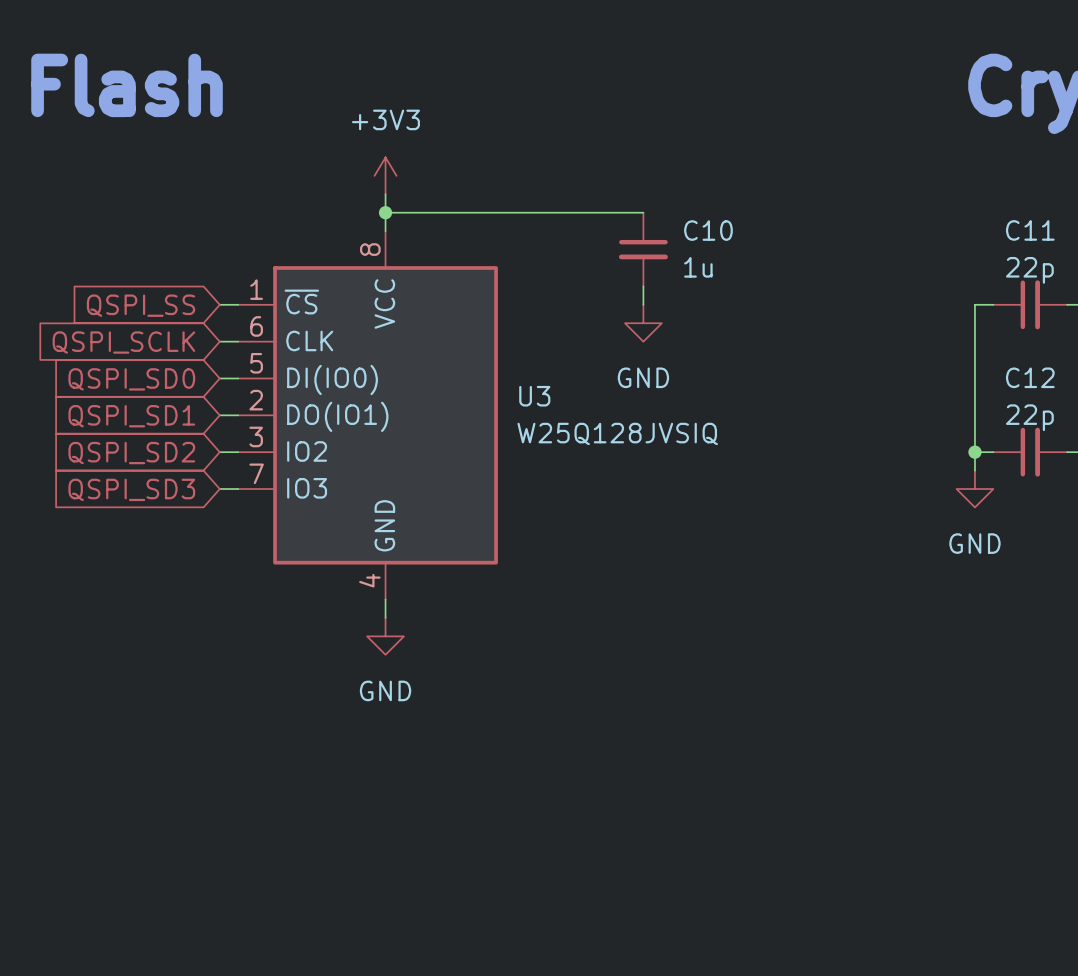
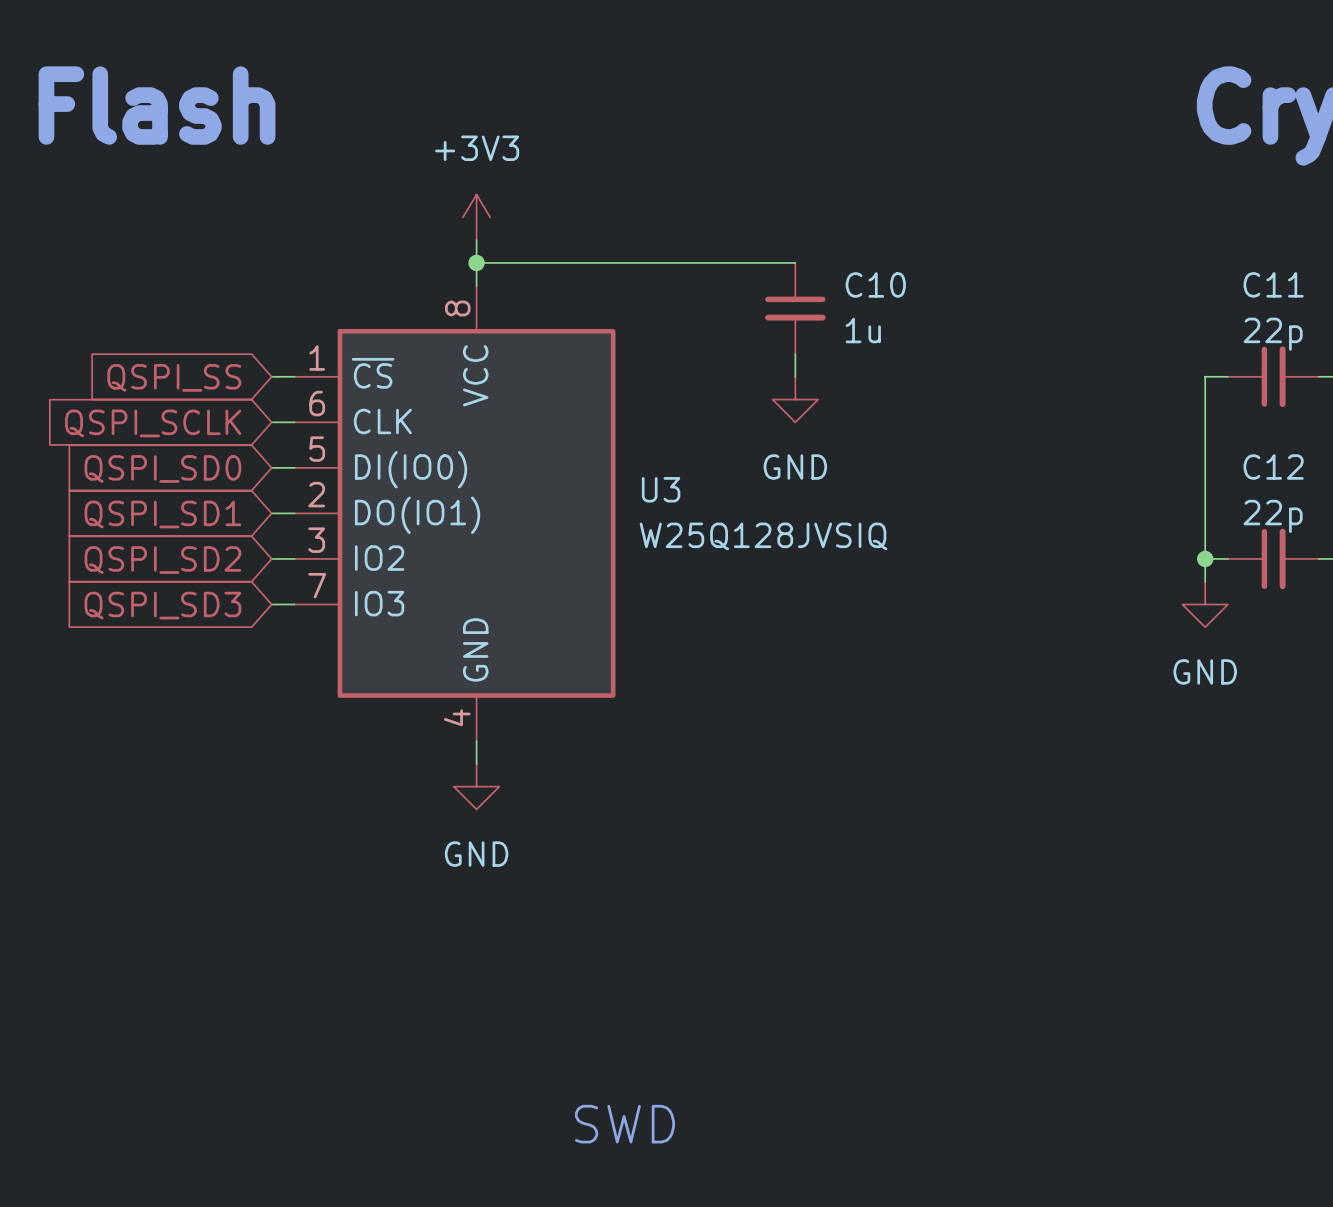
text: none -> SWD (624, 1124)

